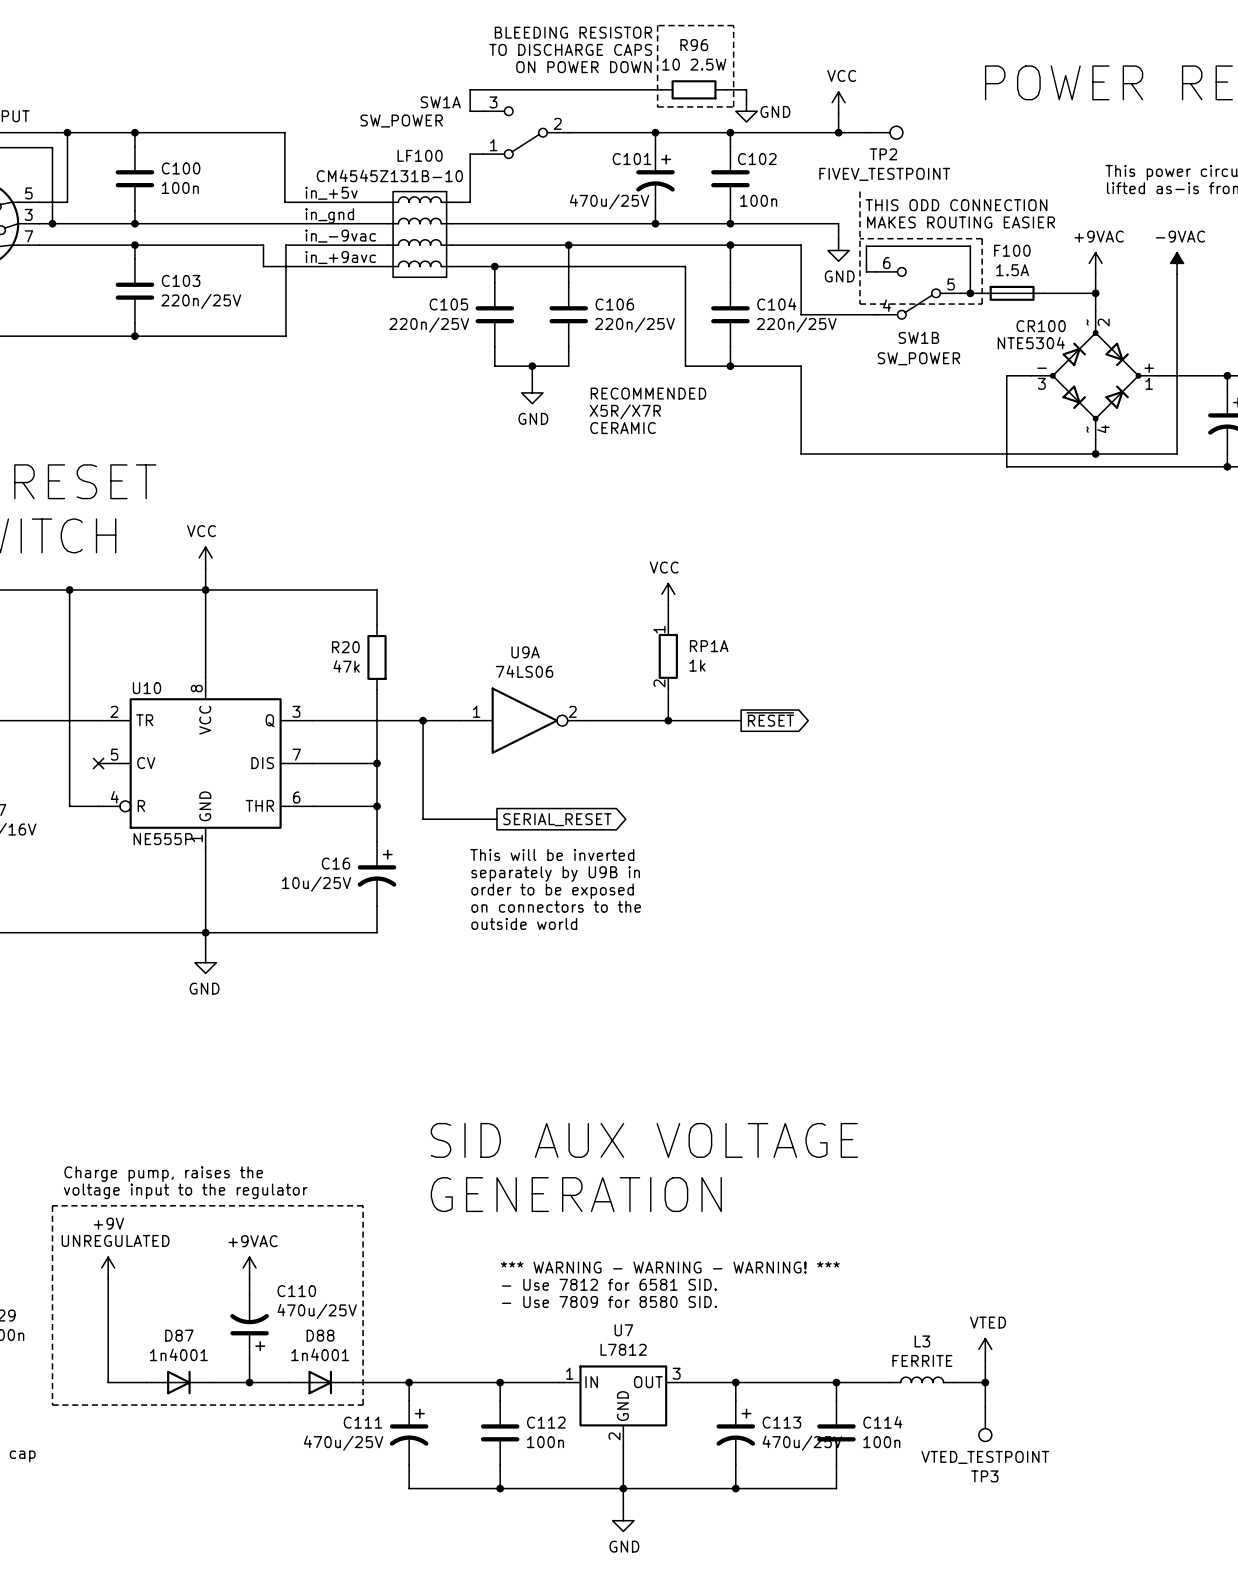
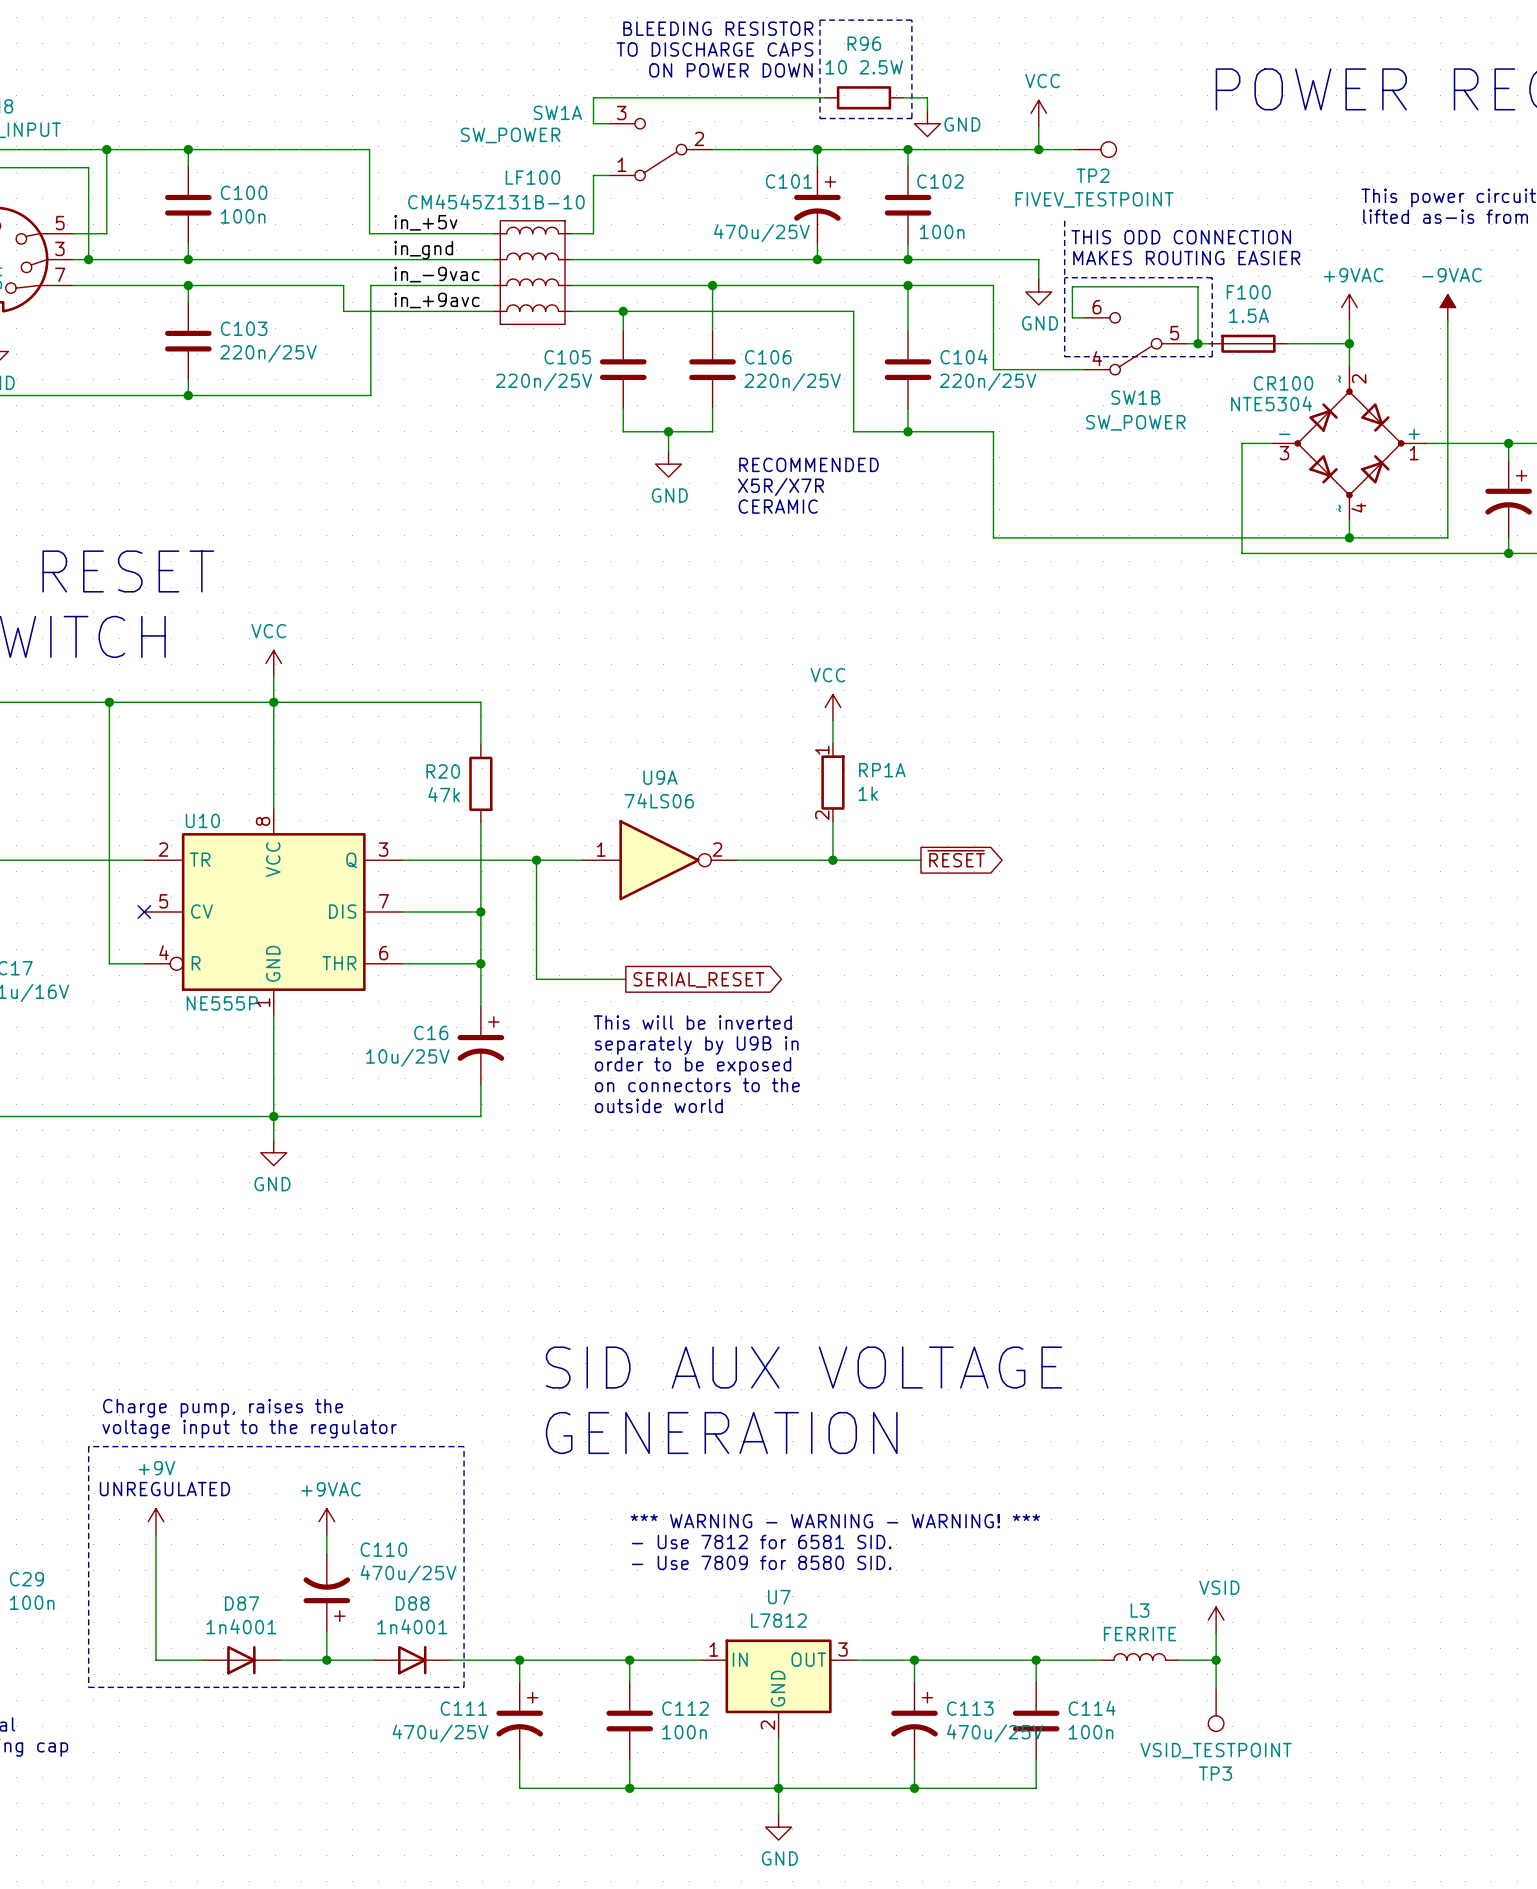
power symbol: VTED (985, 1349) -> VSID (1216, 1620)
TP3 value: VTED_TESTPOINT (985, 1457) -> VSID_TESTPOINT (1216, 1750)

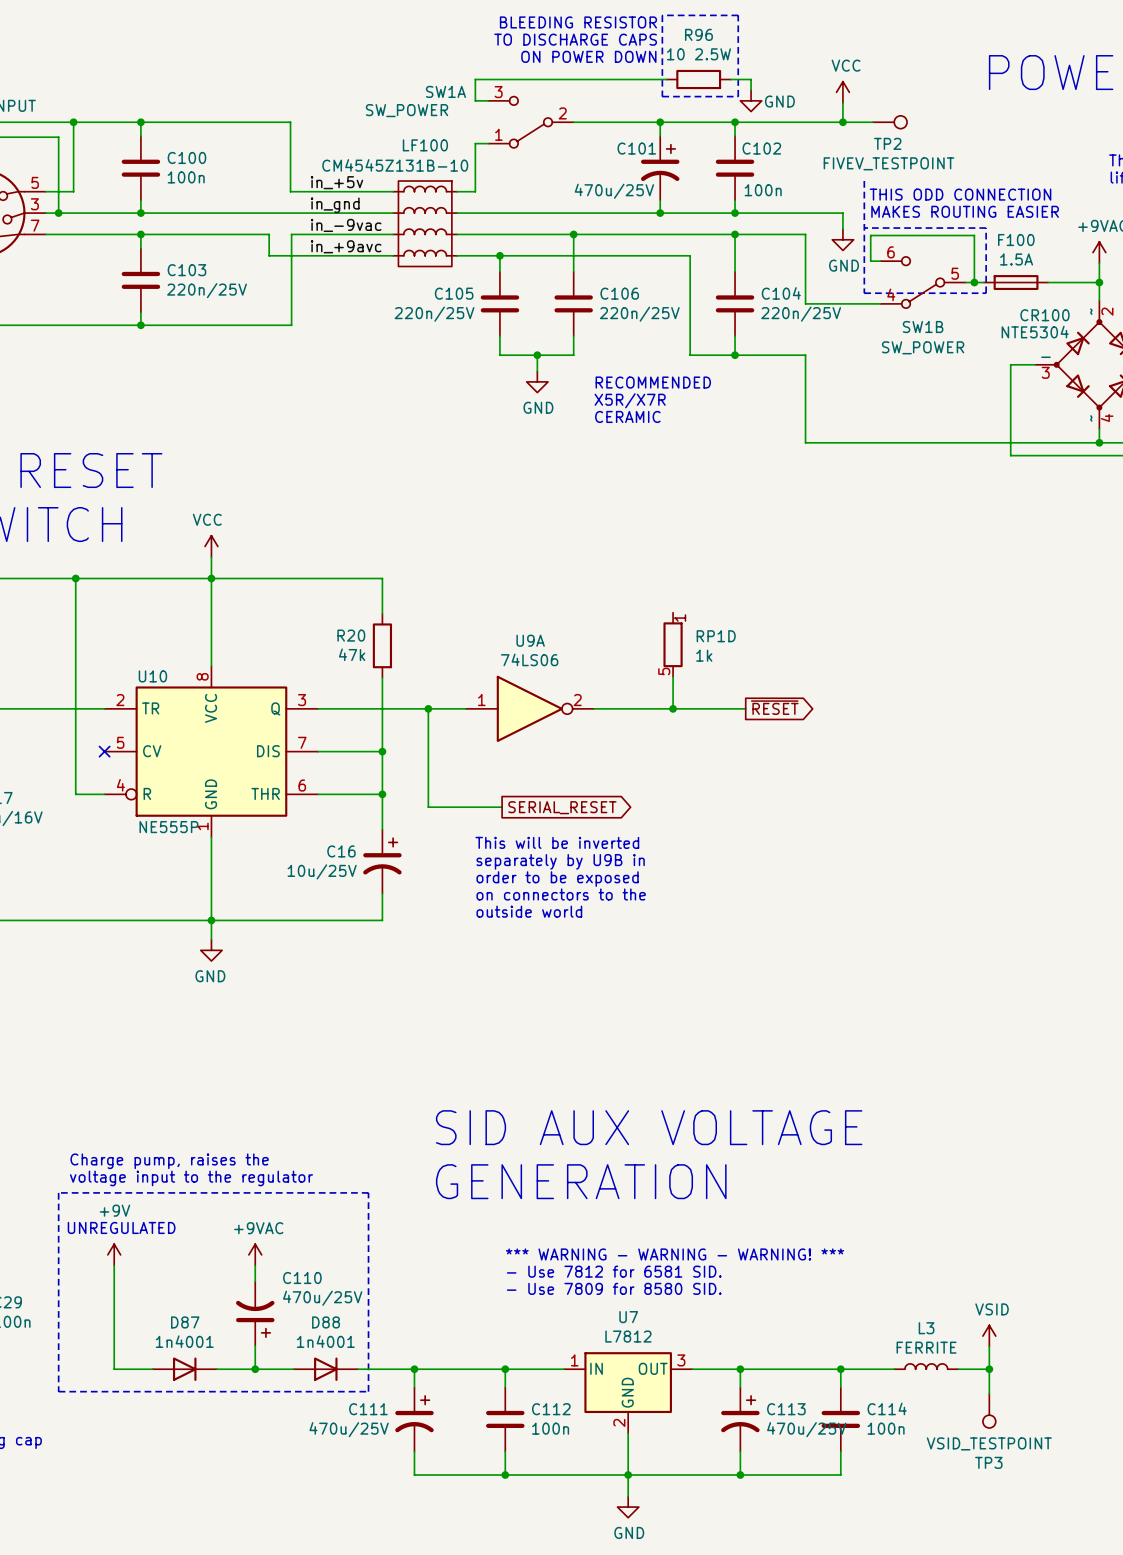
power symbol: VCC (832, 707) -> none
wire: (832, 720) (832, 743) -> none
RP1A: 1k (832, 782) -> none
RP1D: none -> 1k (673, 644)

